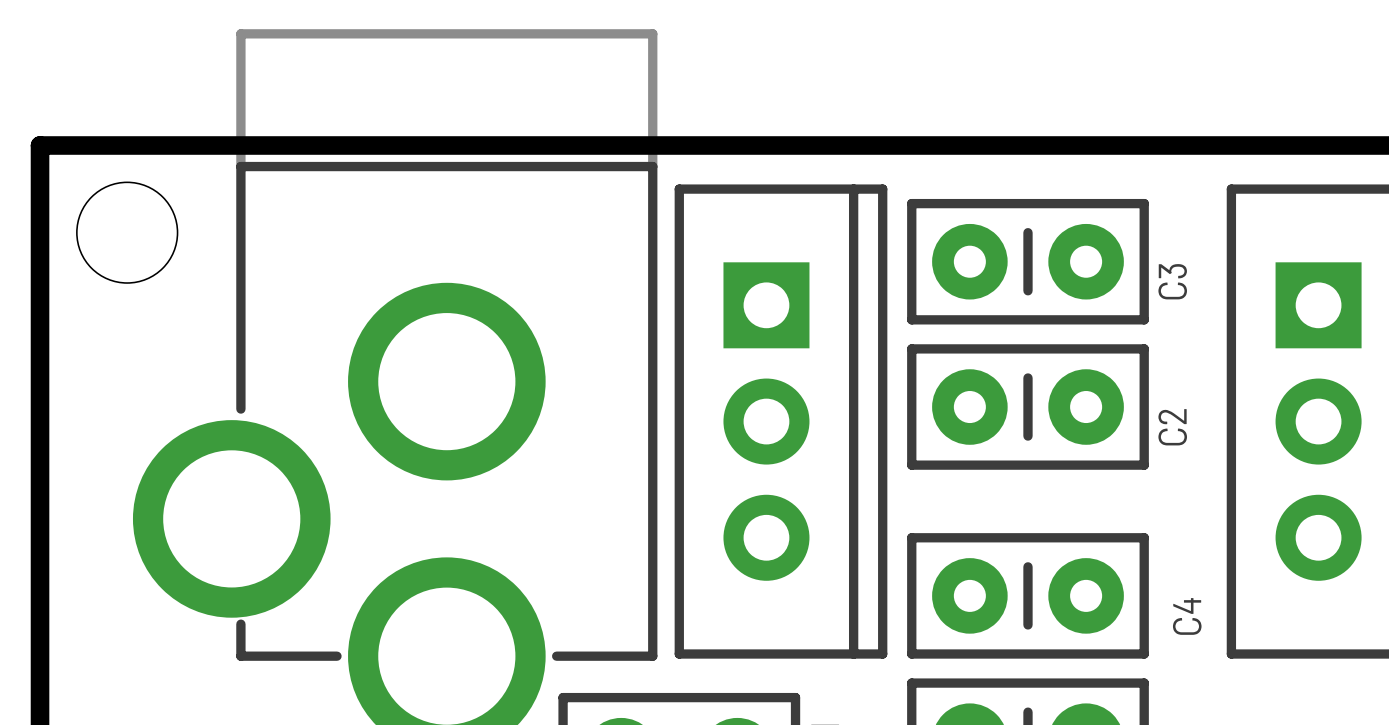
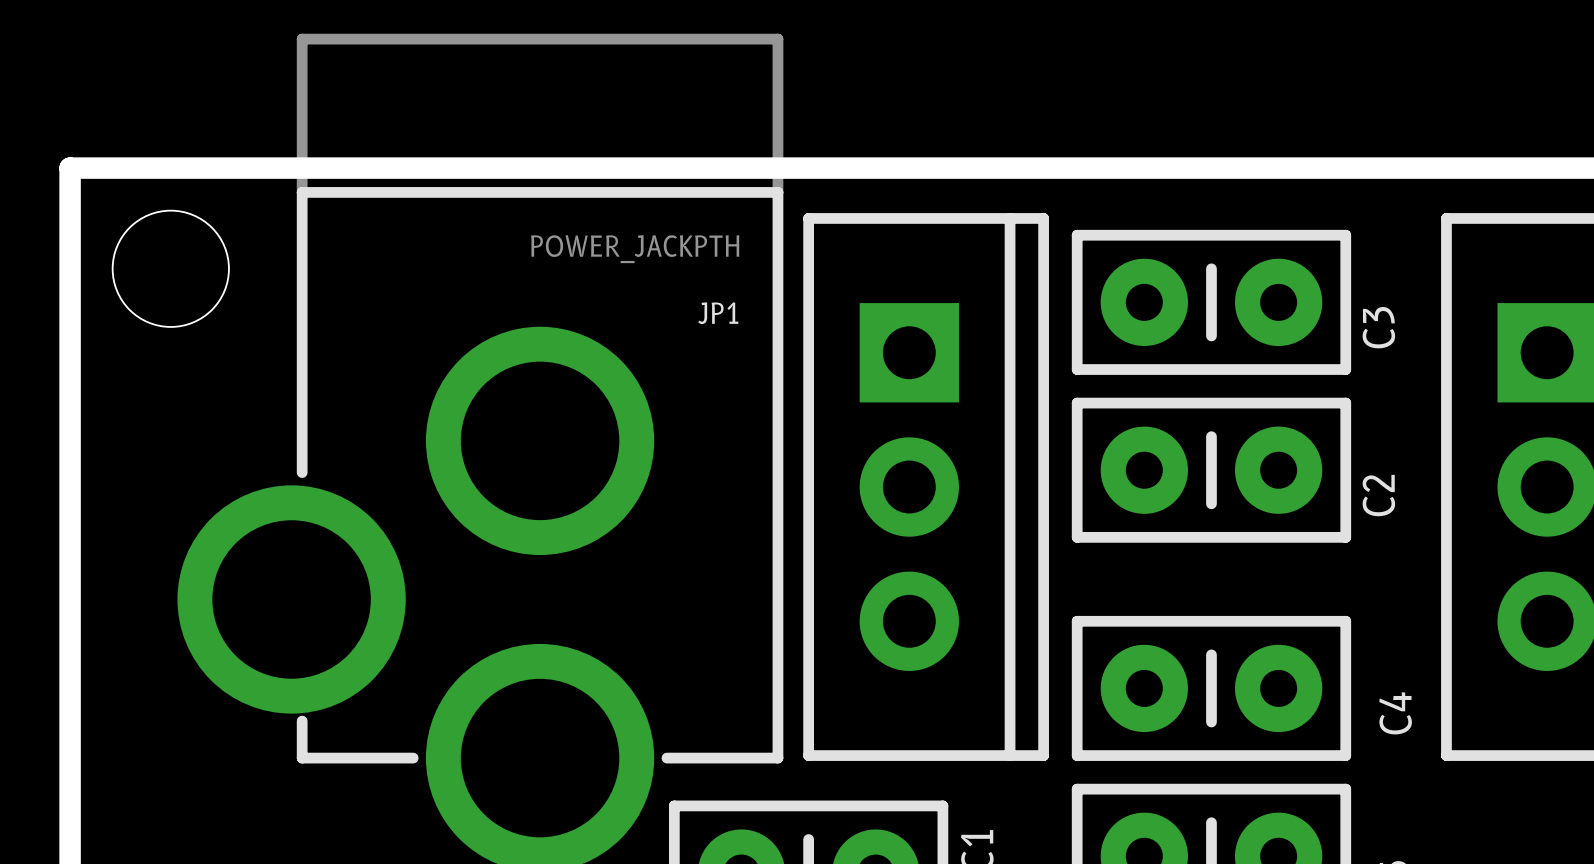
JP1 value: none -> POWER_JACKPTH (635, 249)
JP1 name: none -> JP1 (718, 313)

